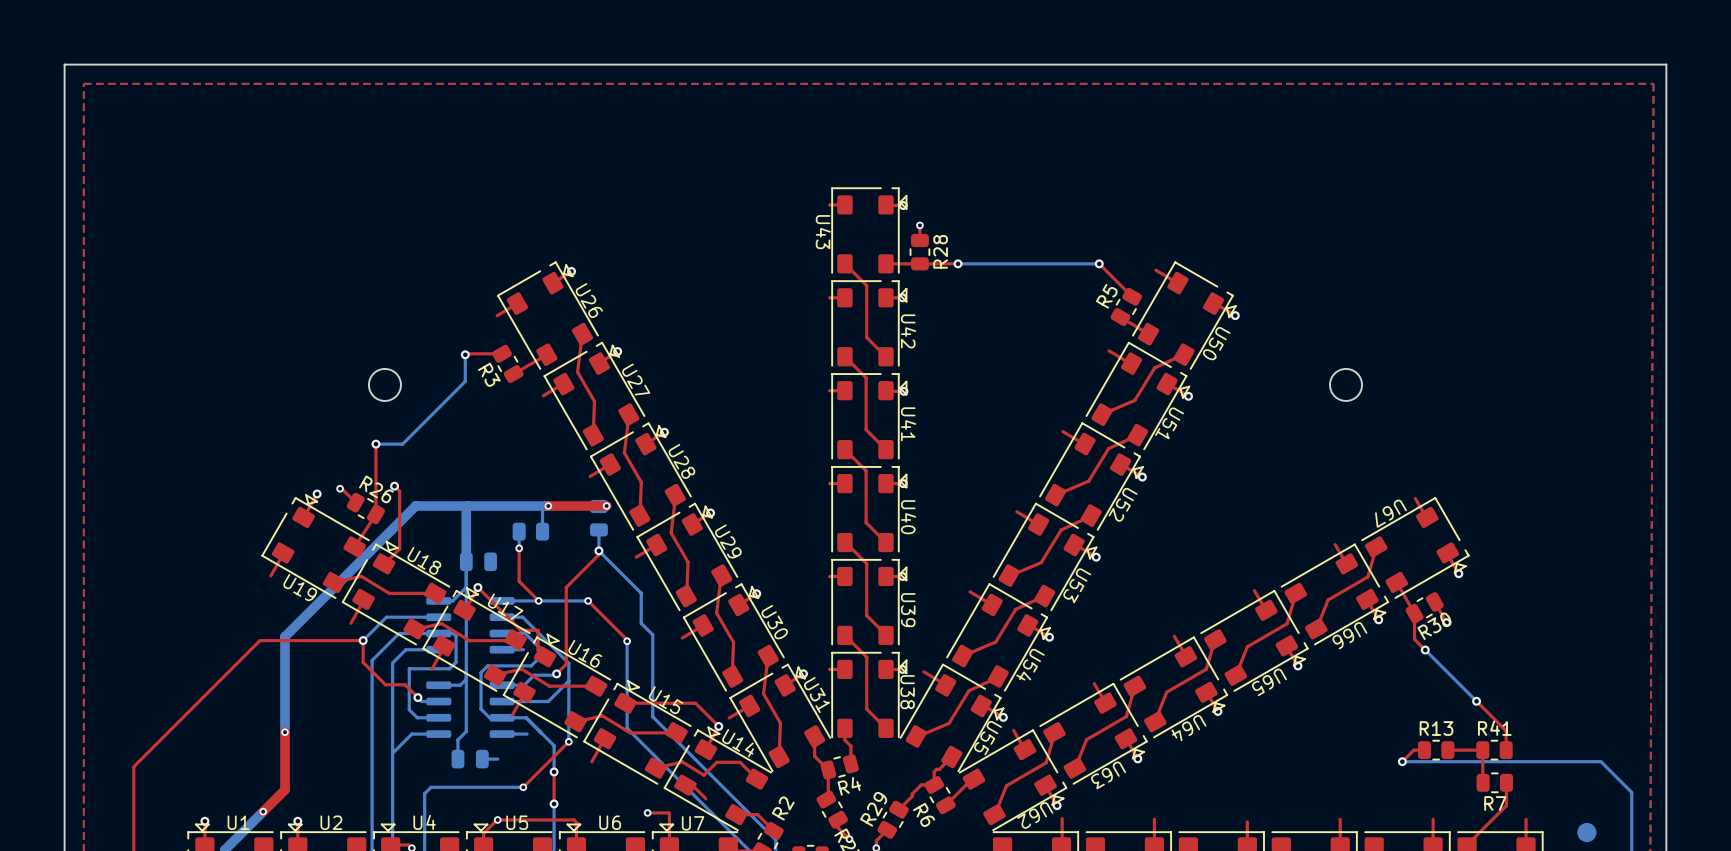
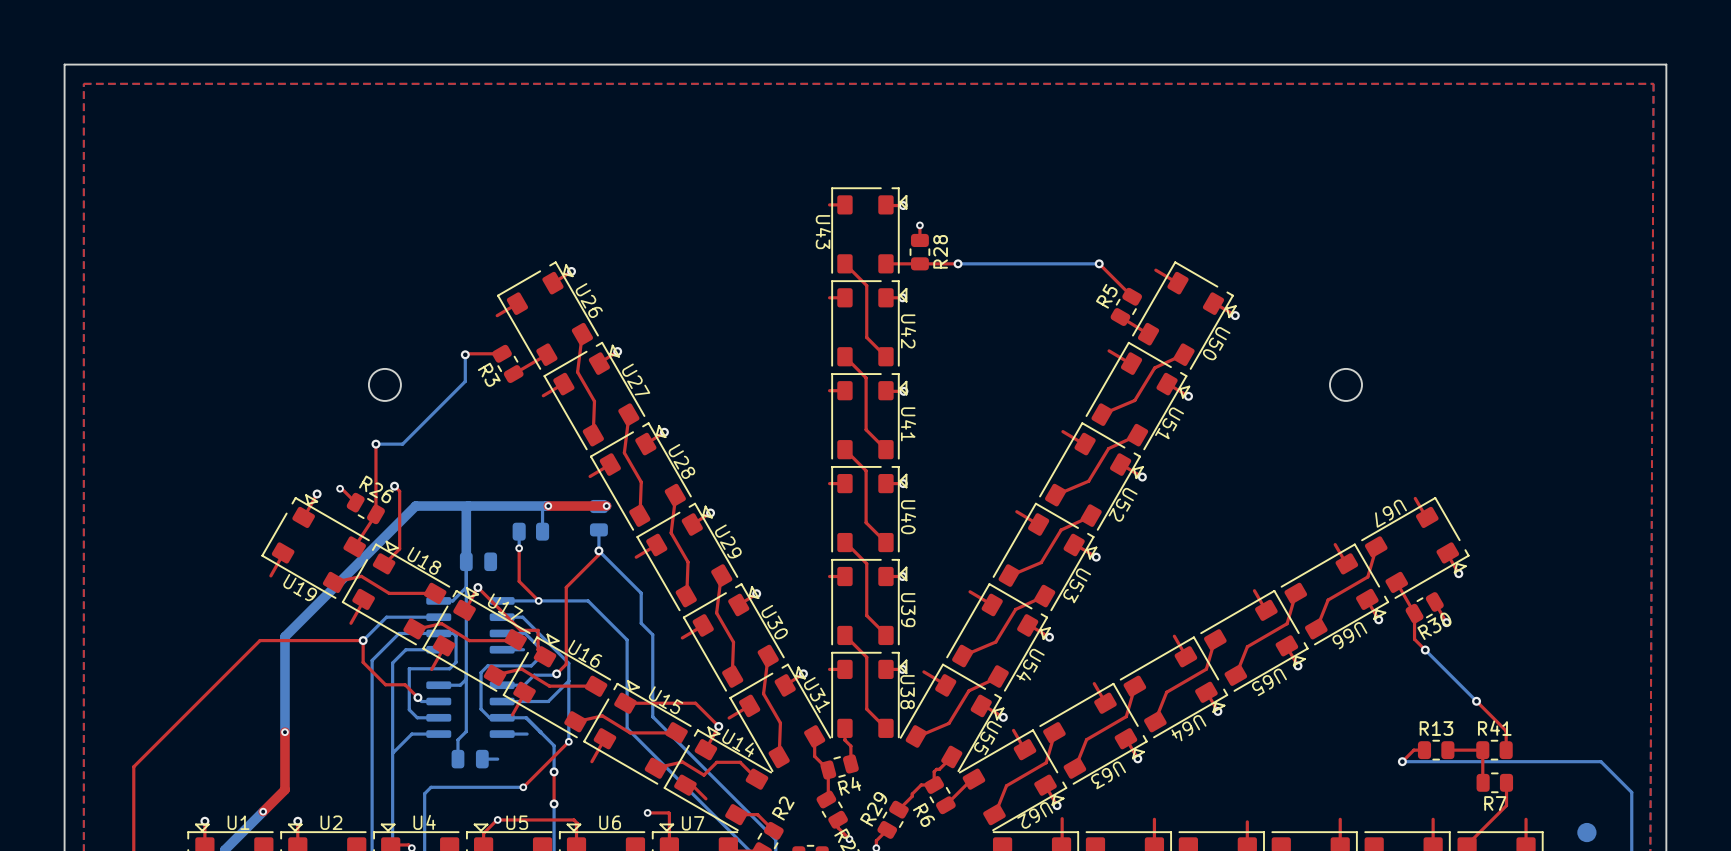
top track: (588, 600) (627, 639) -> none
bottom track: none -> (588, 600) (627, 639)
via: (588, 600) -> none
via: (627, 641) -> none

